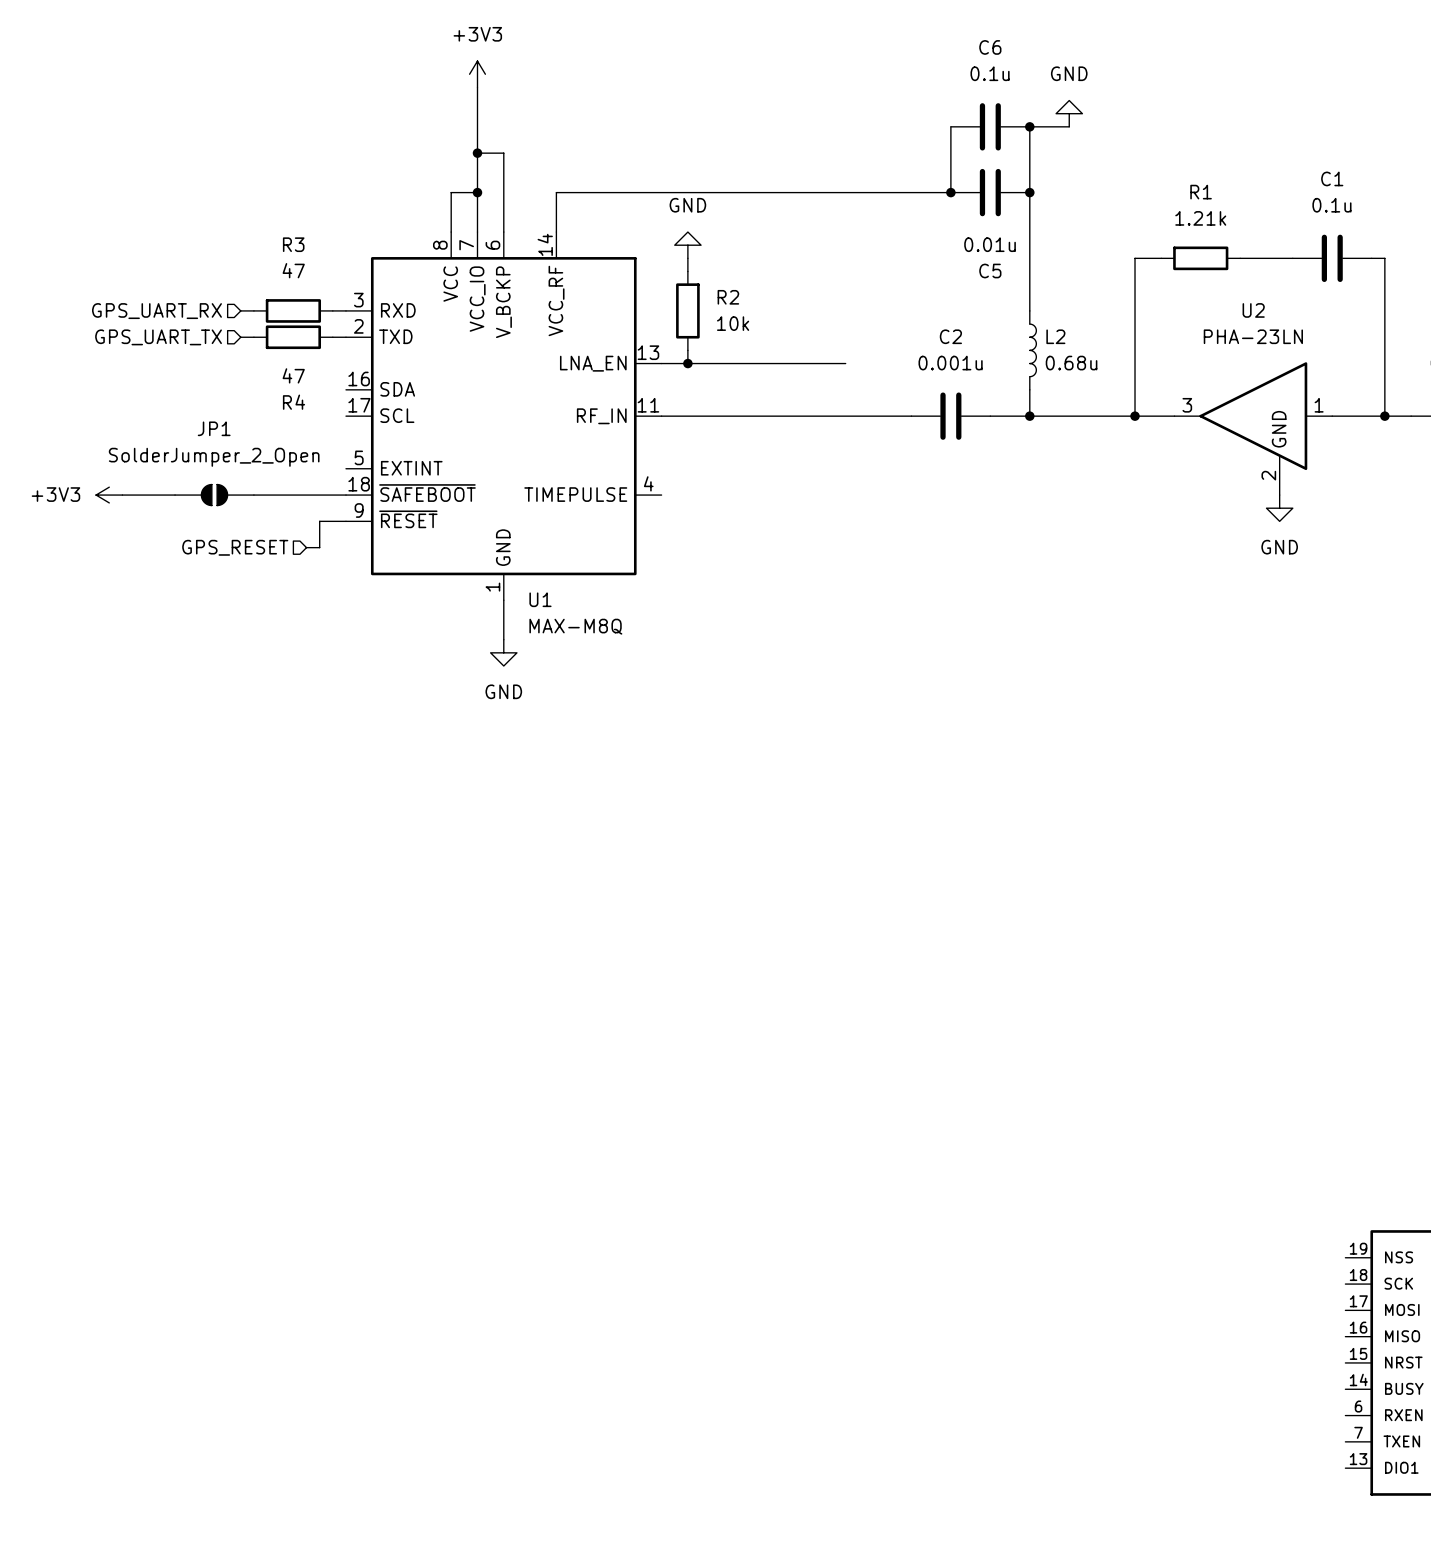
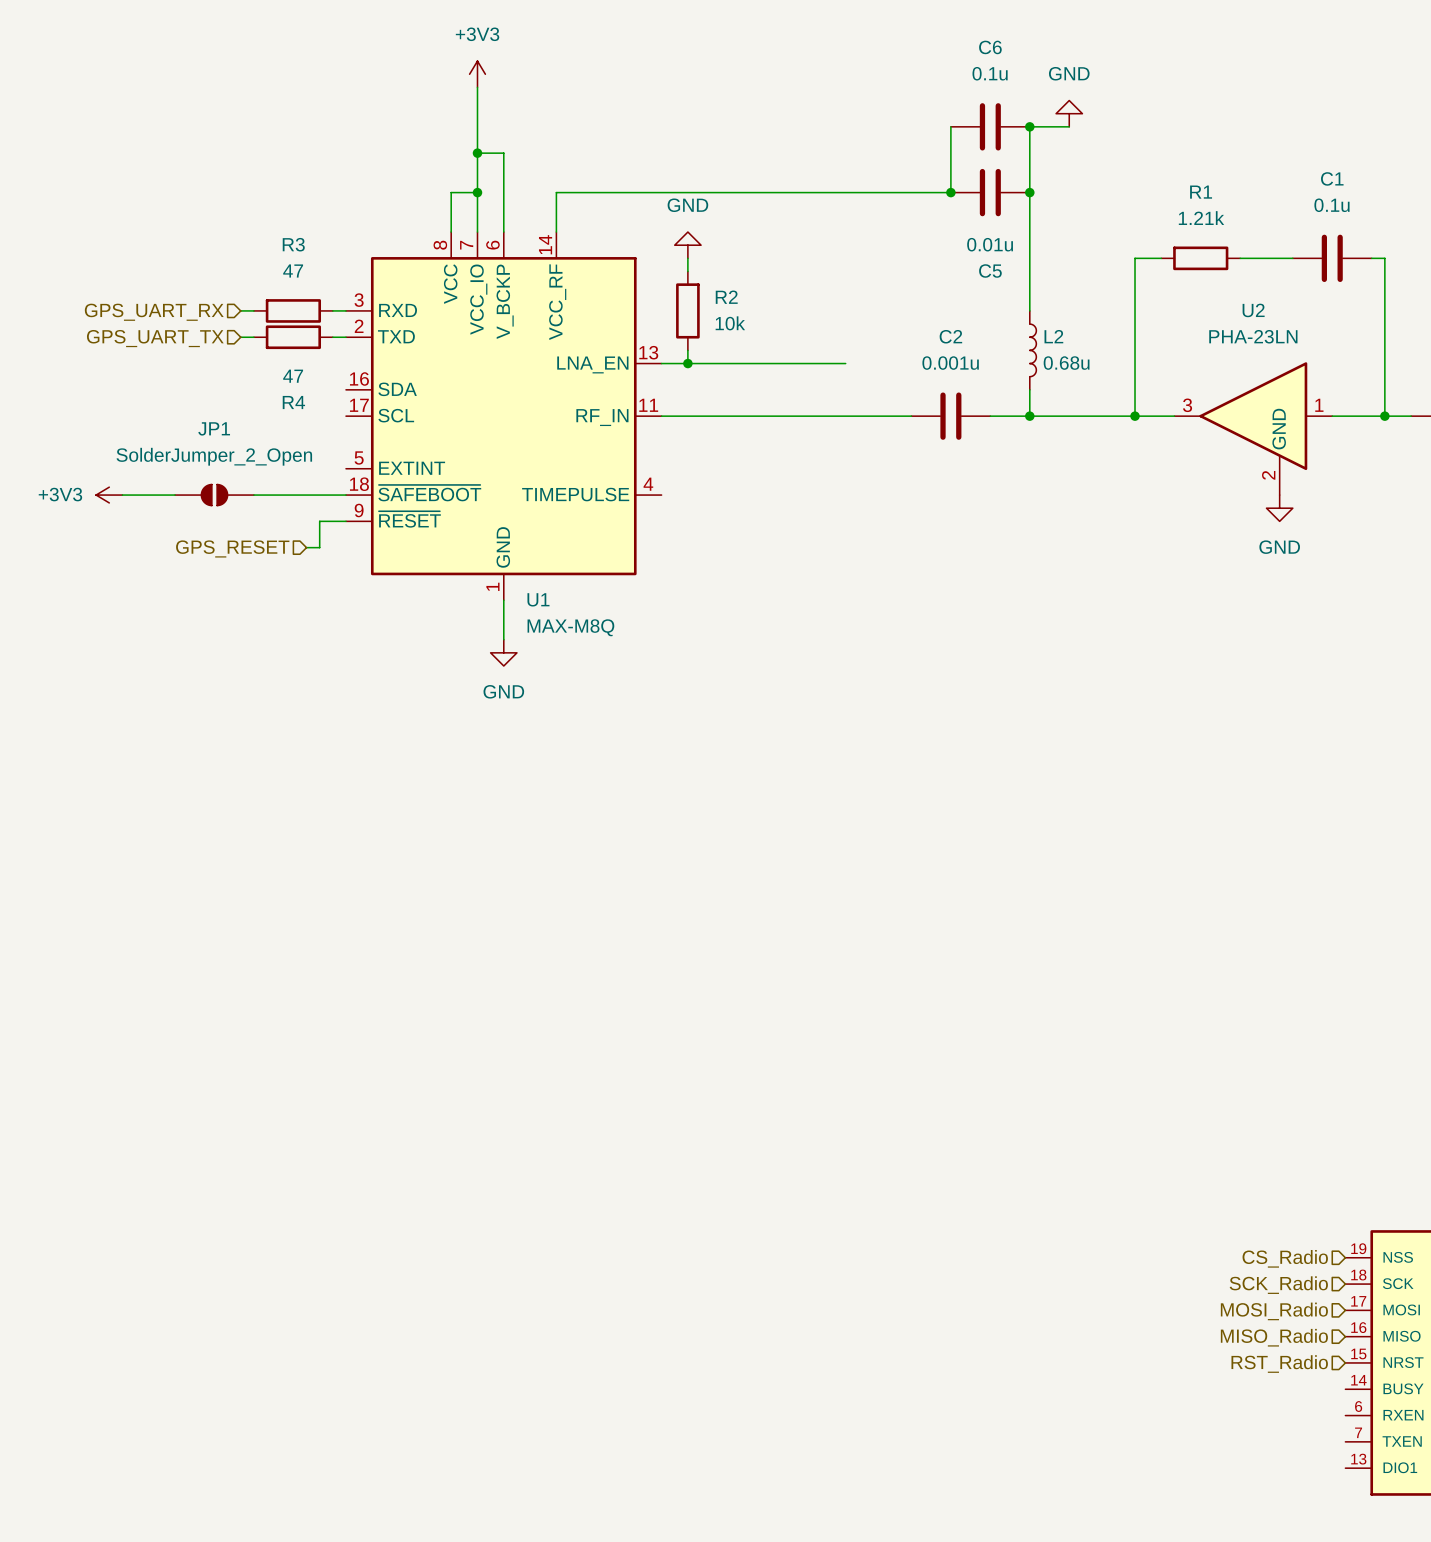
hierarchical label: none -> CS_Radio (1285, 1258)
hierarchical label: none -> SCK_Radio (1278, 1285)
hierarchical label: none -> MOSI_Radio (1274, 1311)
hierarchical label: none -> MISO_Radio (1274, 1337)
hierarchical label: none -> RST_Radio (1279, 1364)

